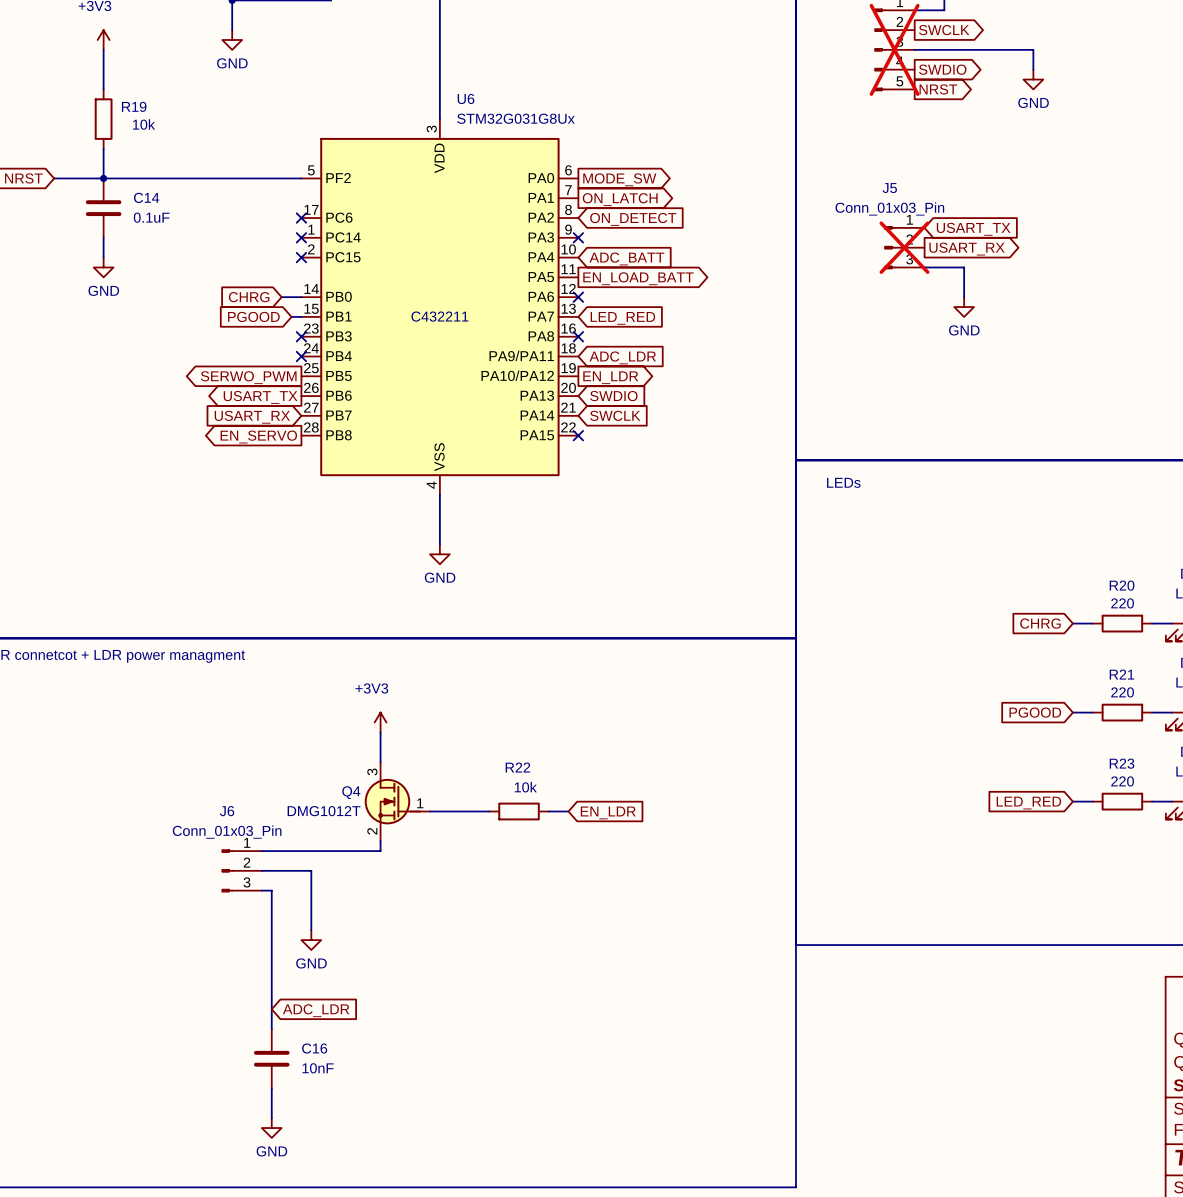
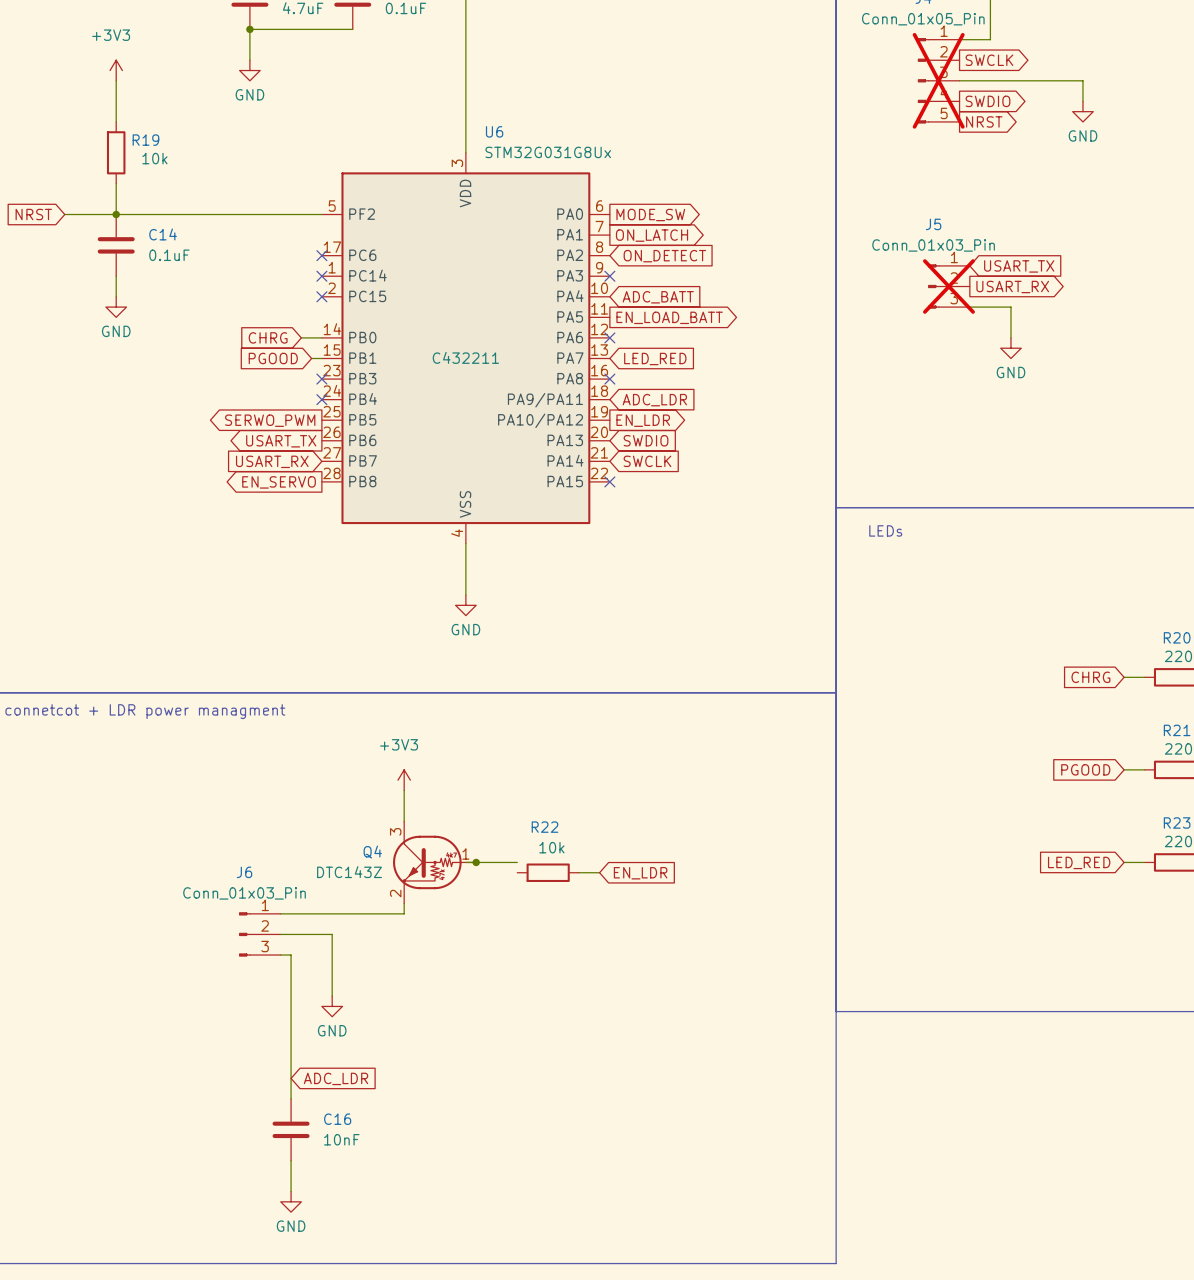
Q4 symbol: [364, 762, 431, 842] -> [392, 821, 477, 904]
wire: none -> (465, 862) (517, 862)
junction: none -> (476, 862)
Q4 value: DMG1012T (324, 811) -> DTC143Z (349, 872)
wire: (430, 811) (489, 811) -> none

